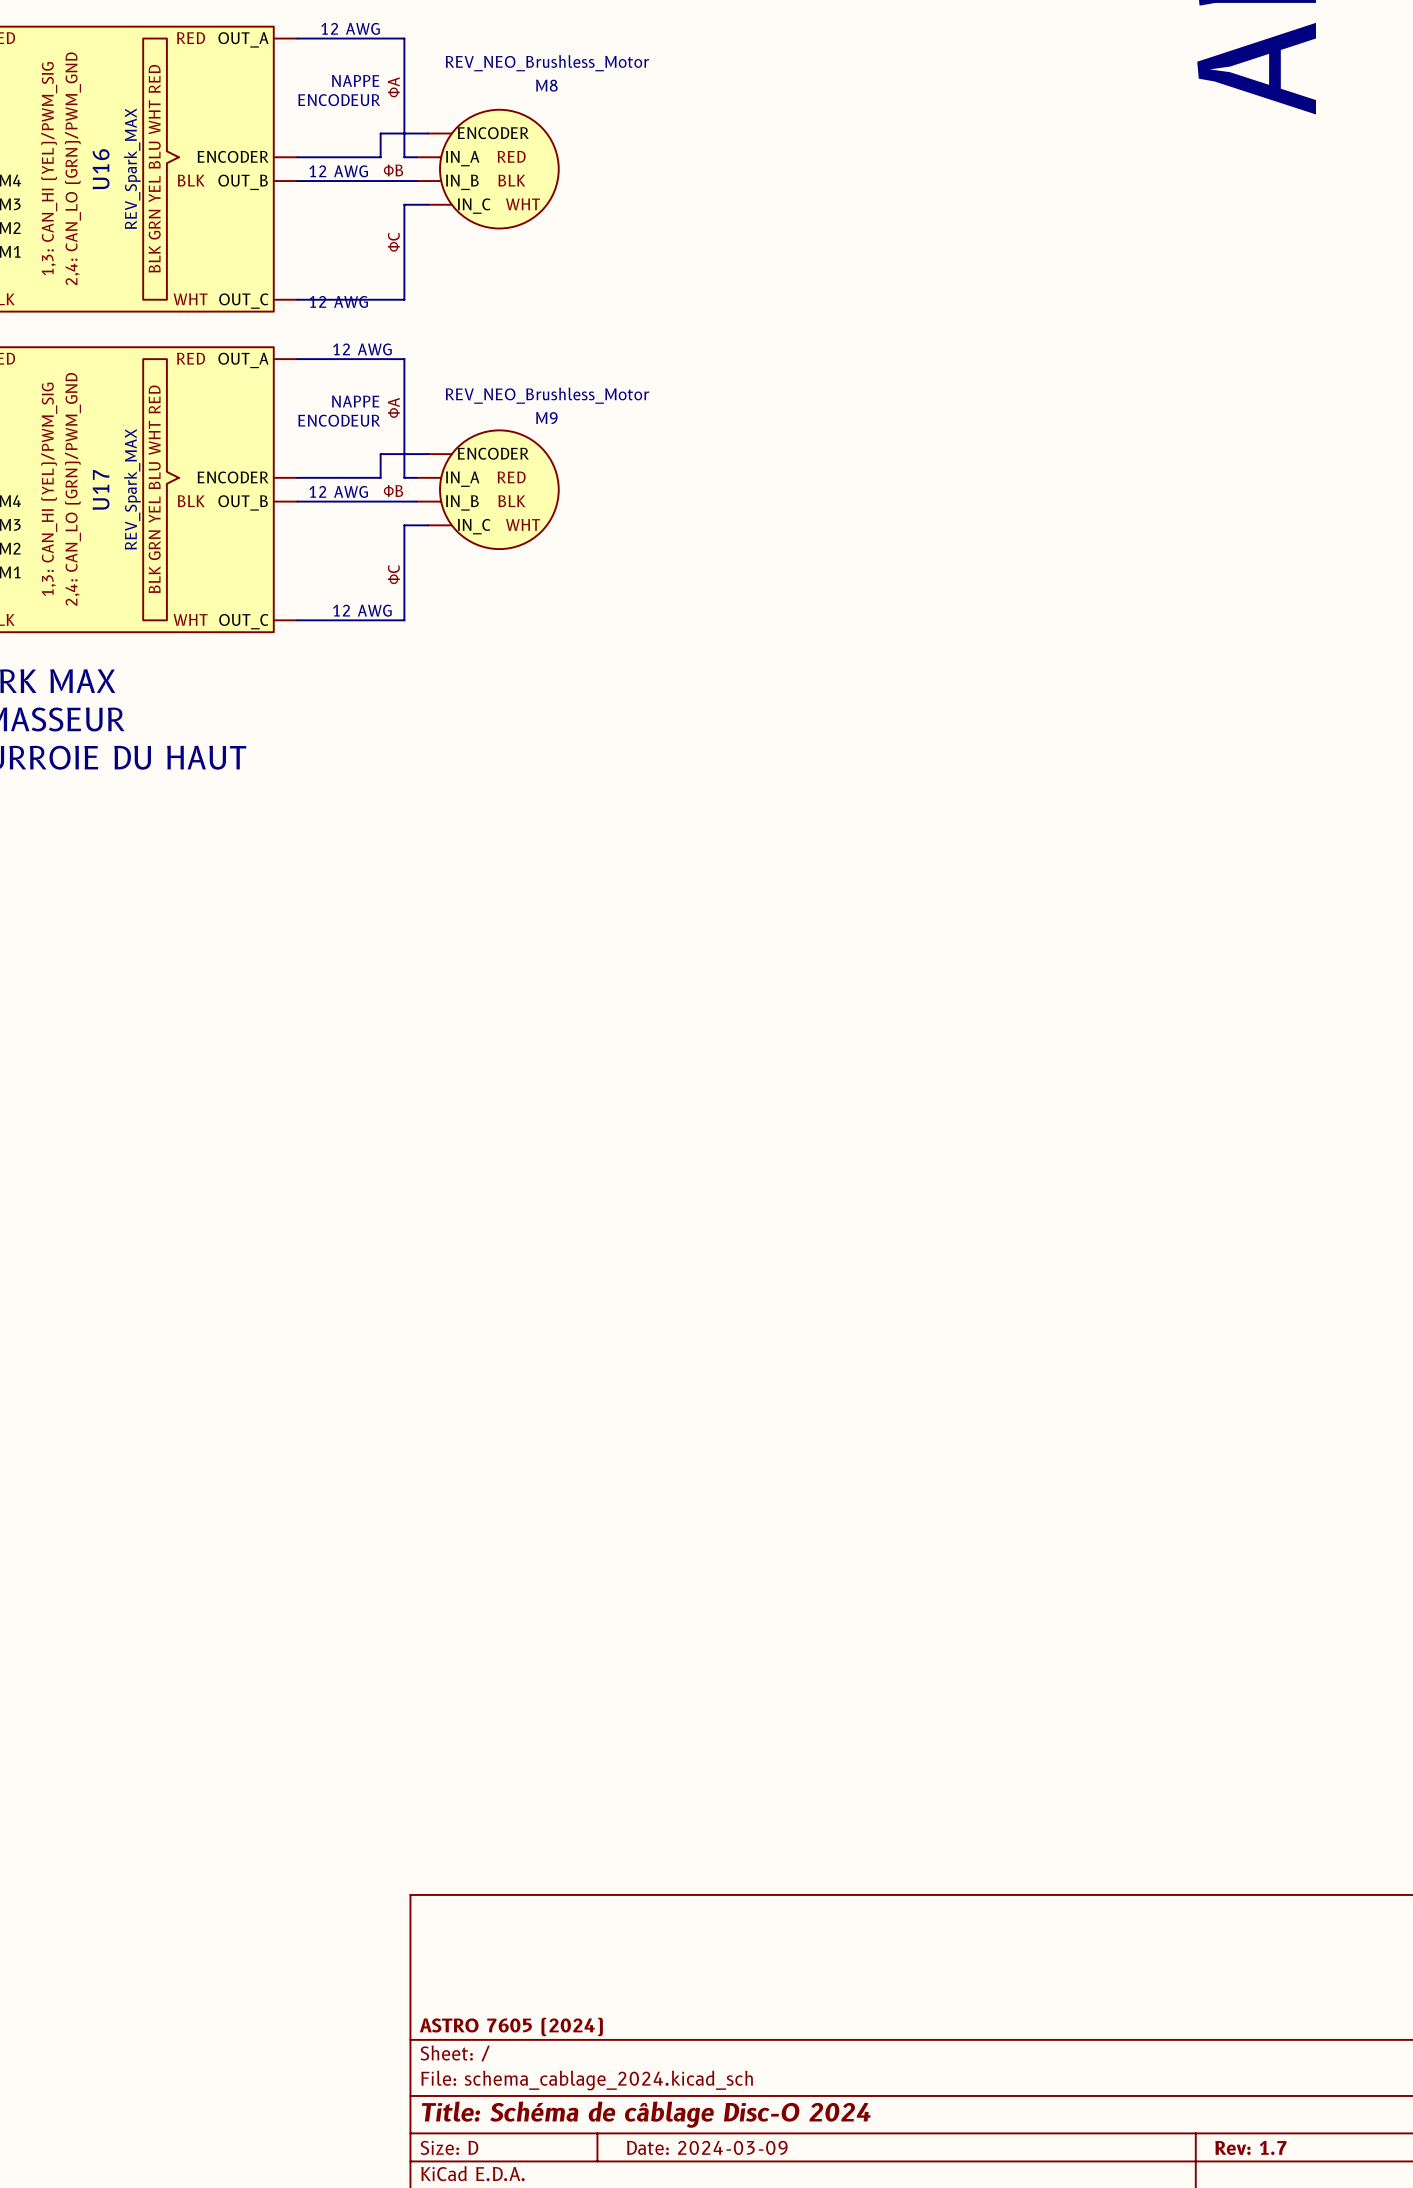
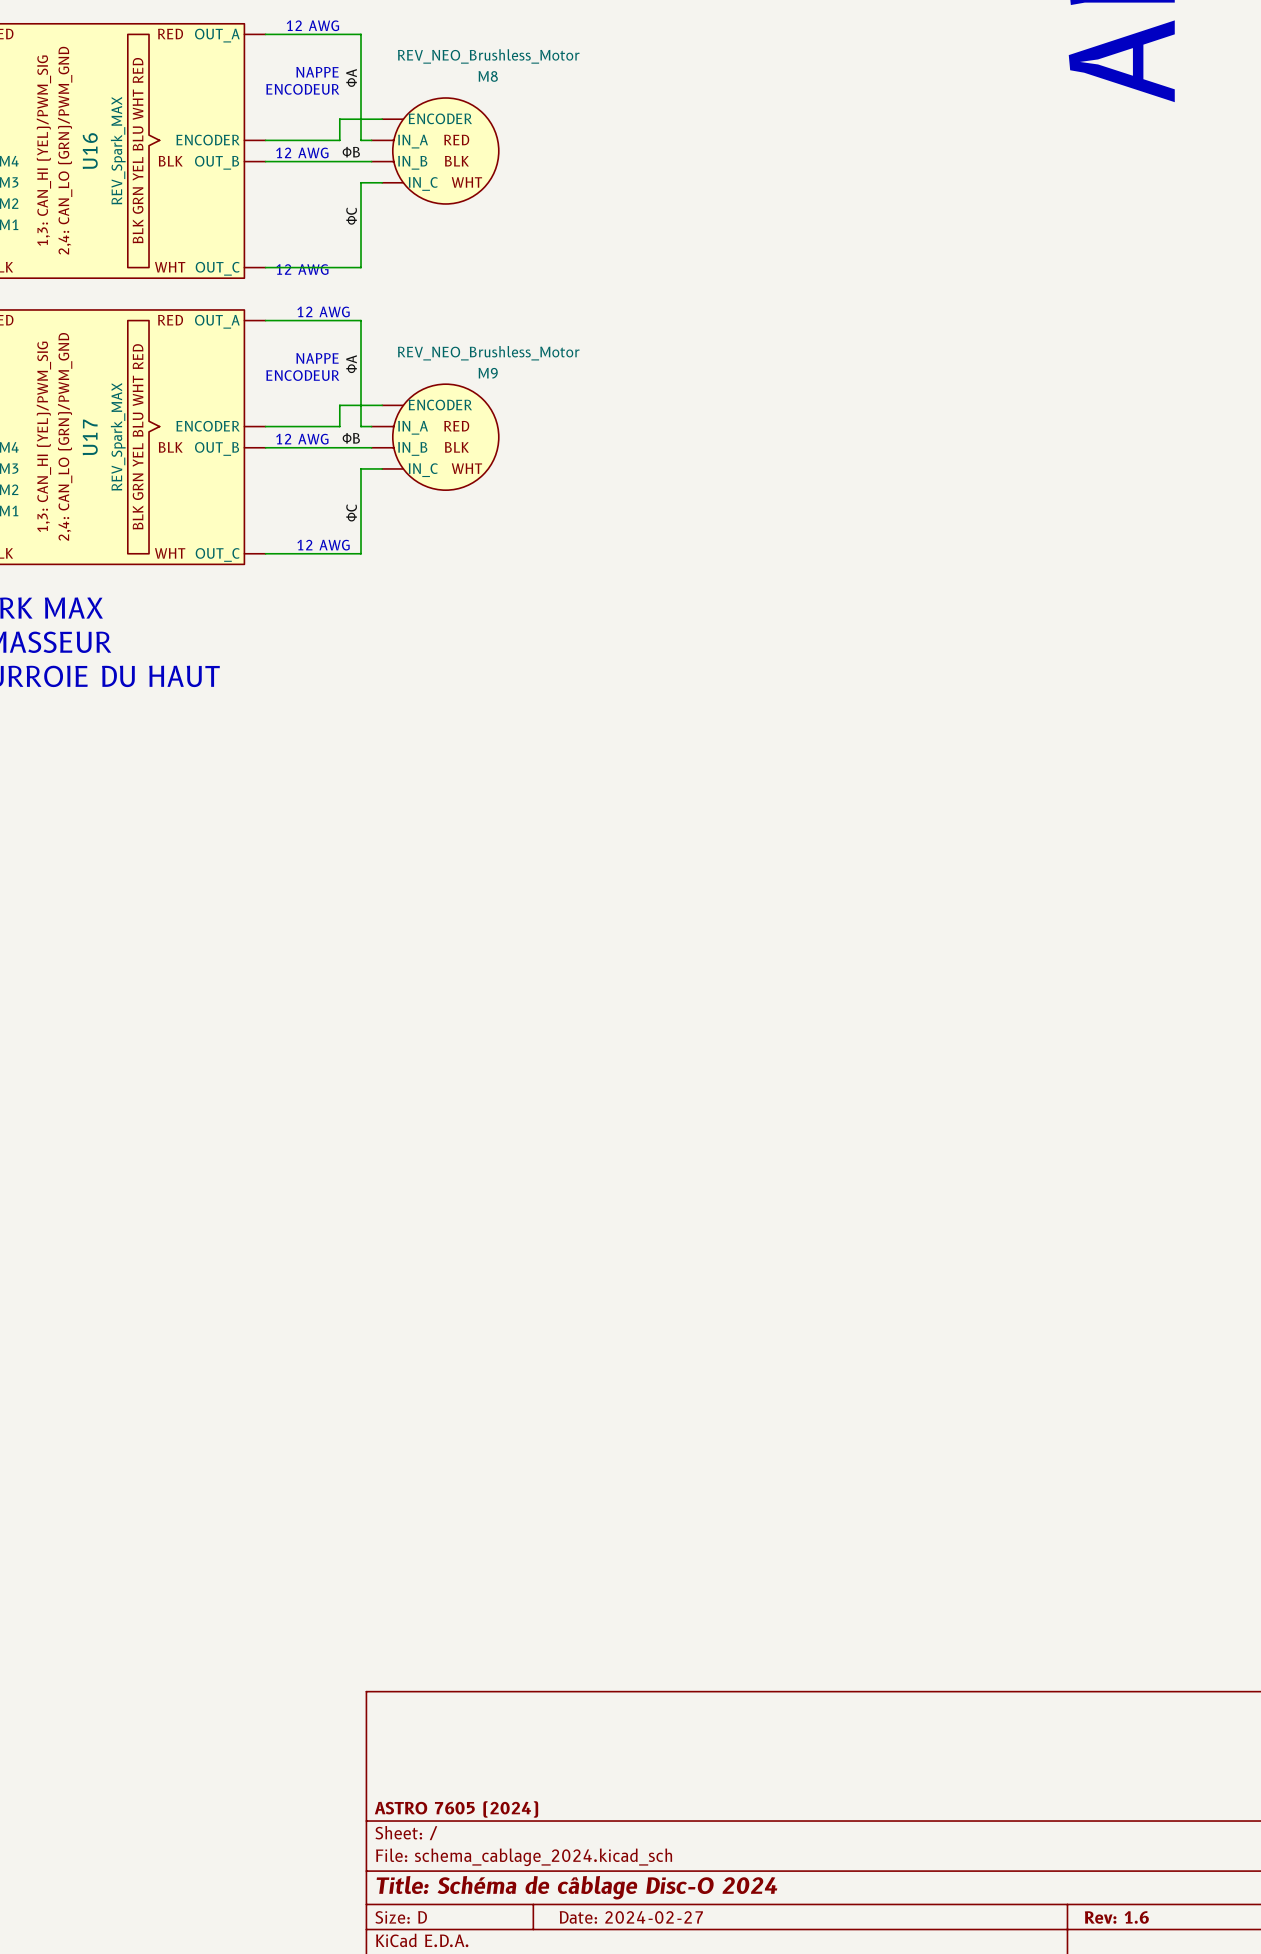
title block: Date: 2024-03-09 (707, 2147) -> Date: 2024-02-27 (631, 1917)
title block: Rev: 1.7 (1250, 2147) -> Rev: 1.6 (1116, 1917)

